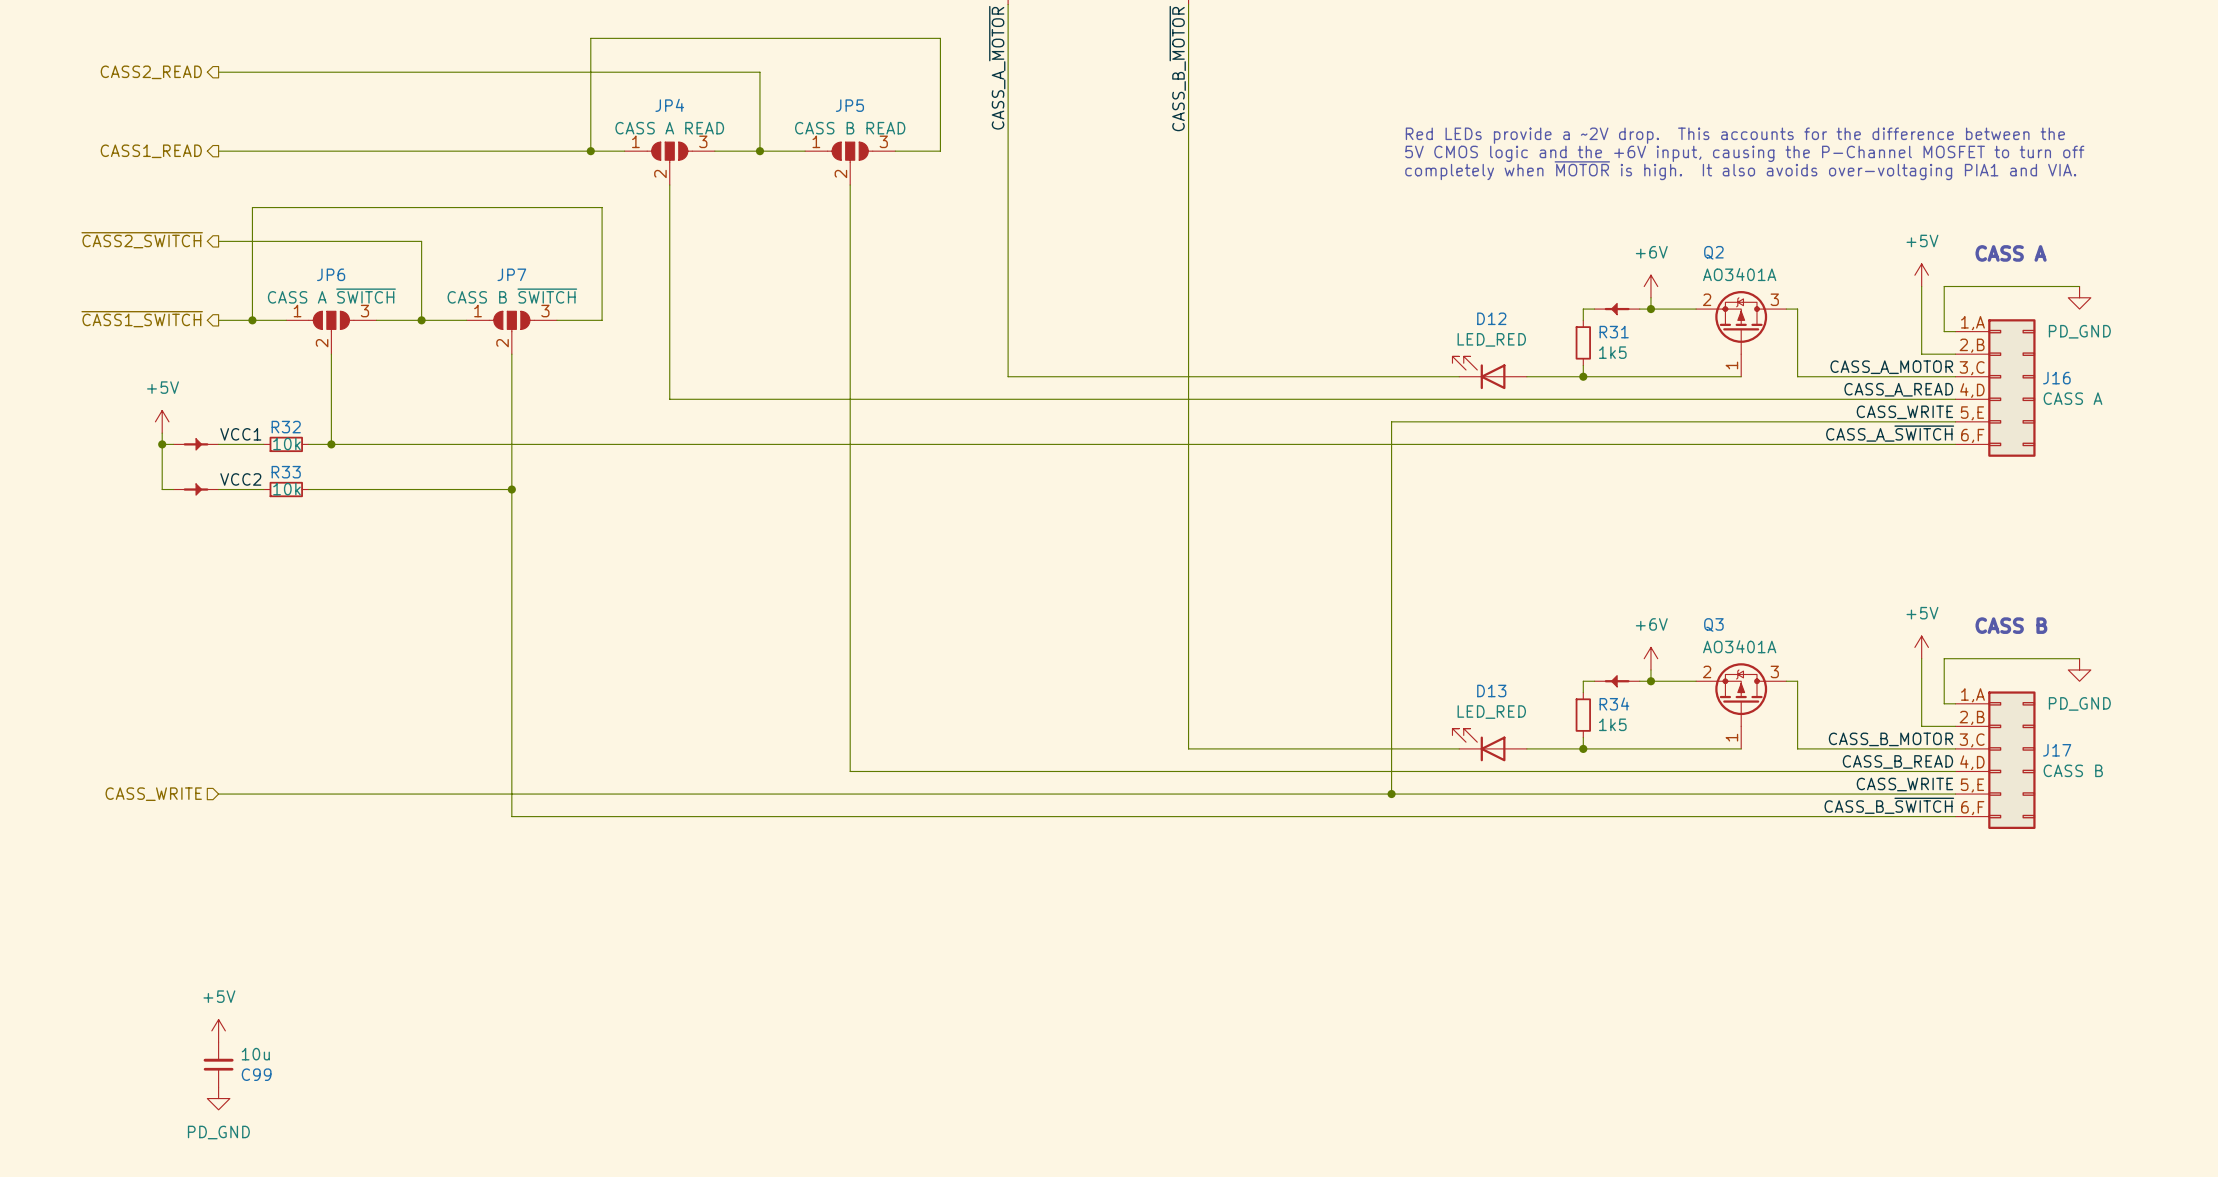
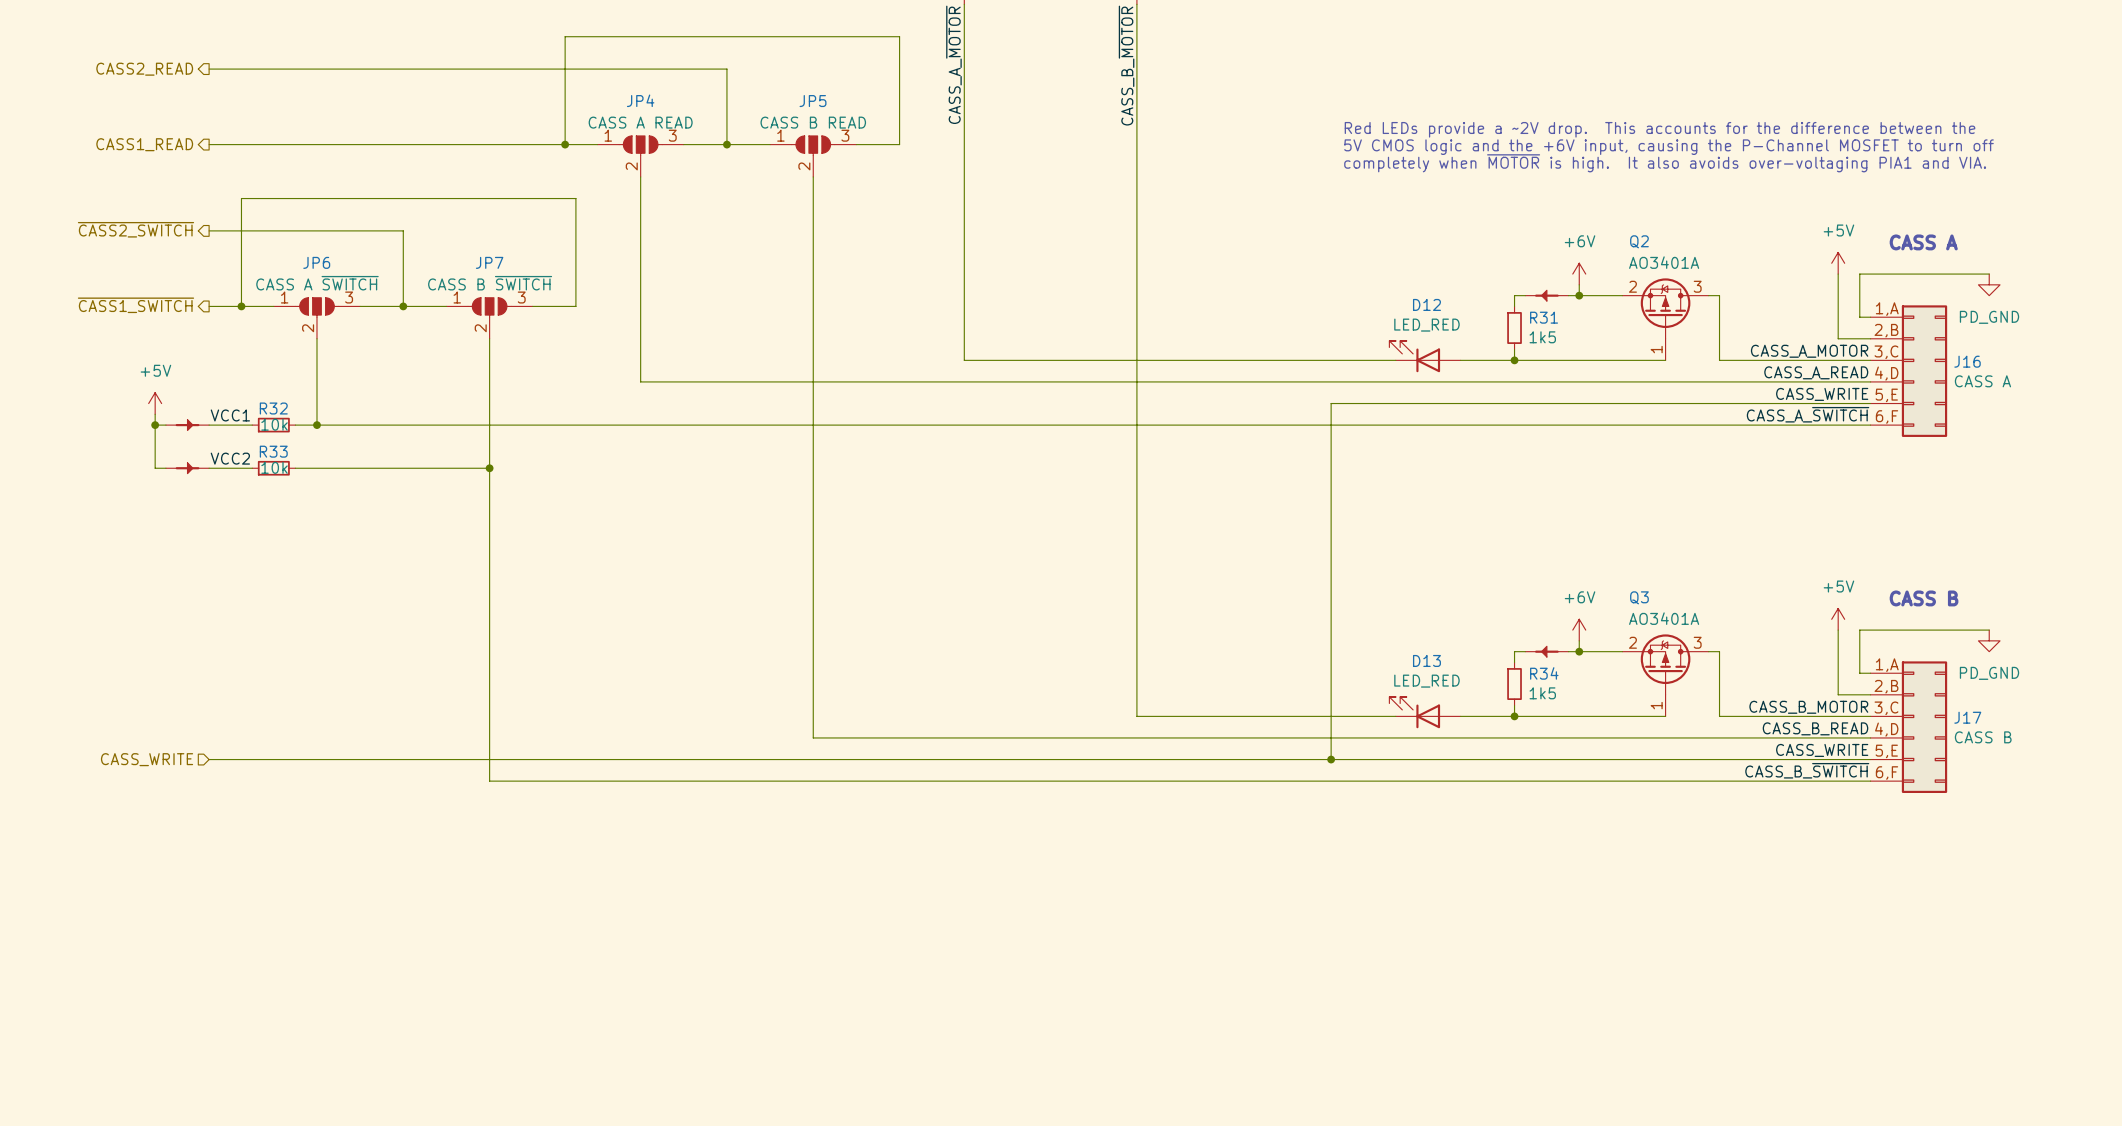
power symbol: +5V (218, 1030) -> none
C99: 10u (218, 1064) -> none
power symbol: PD_GND (218, 1098) -> none

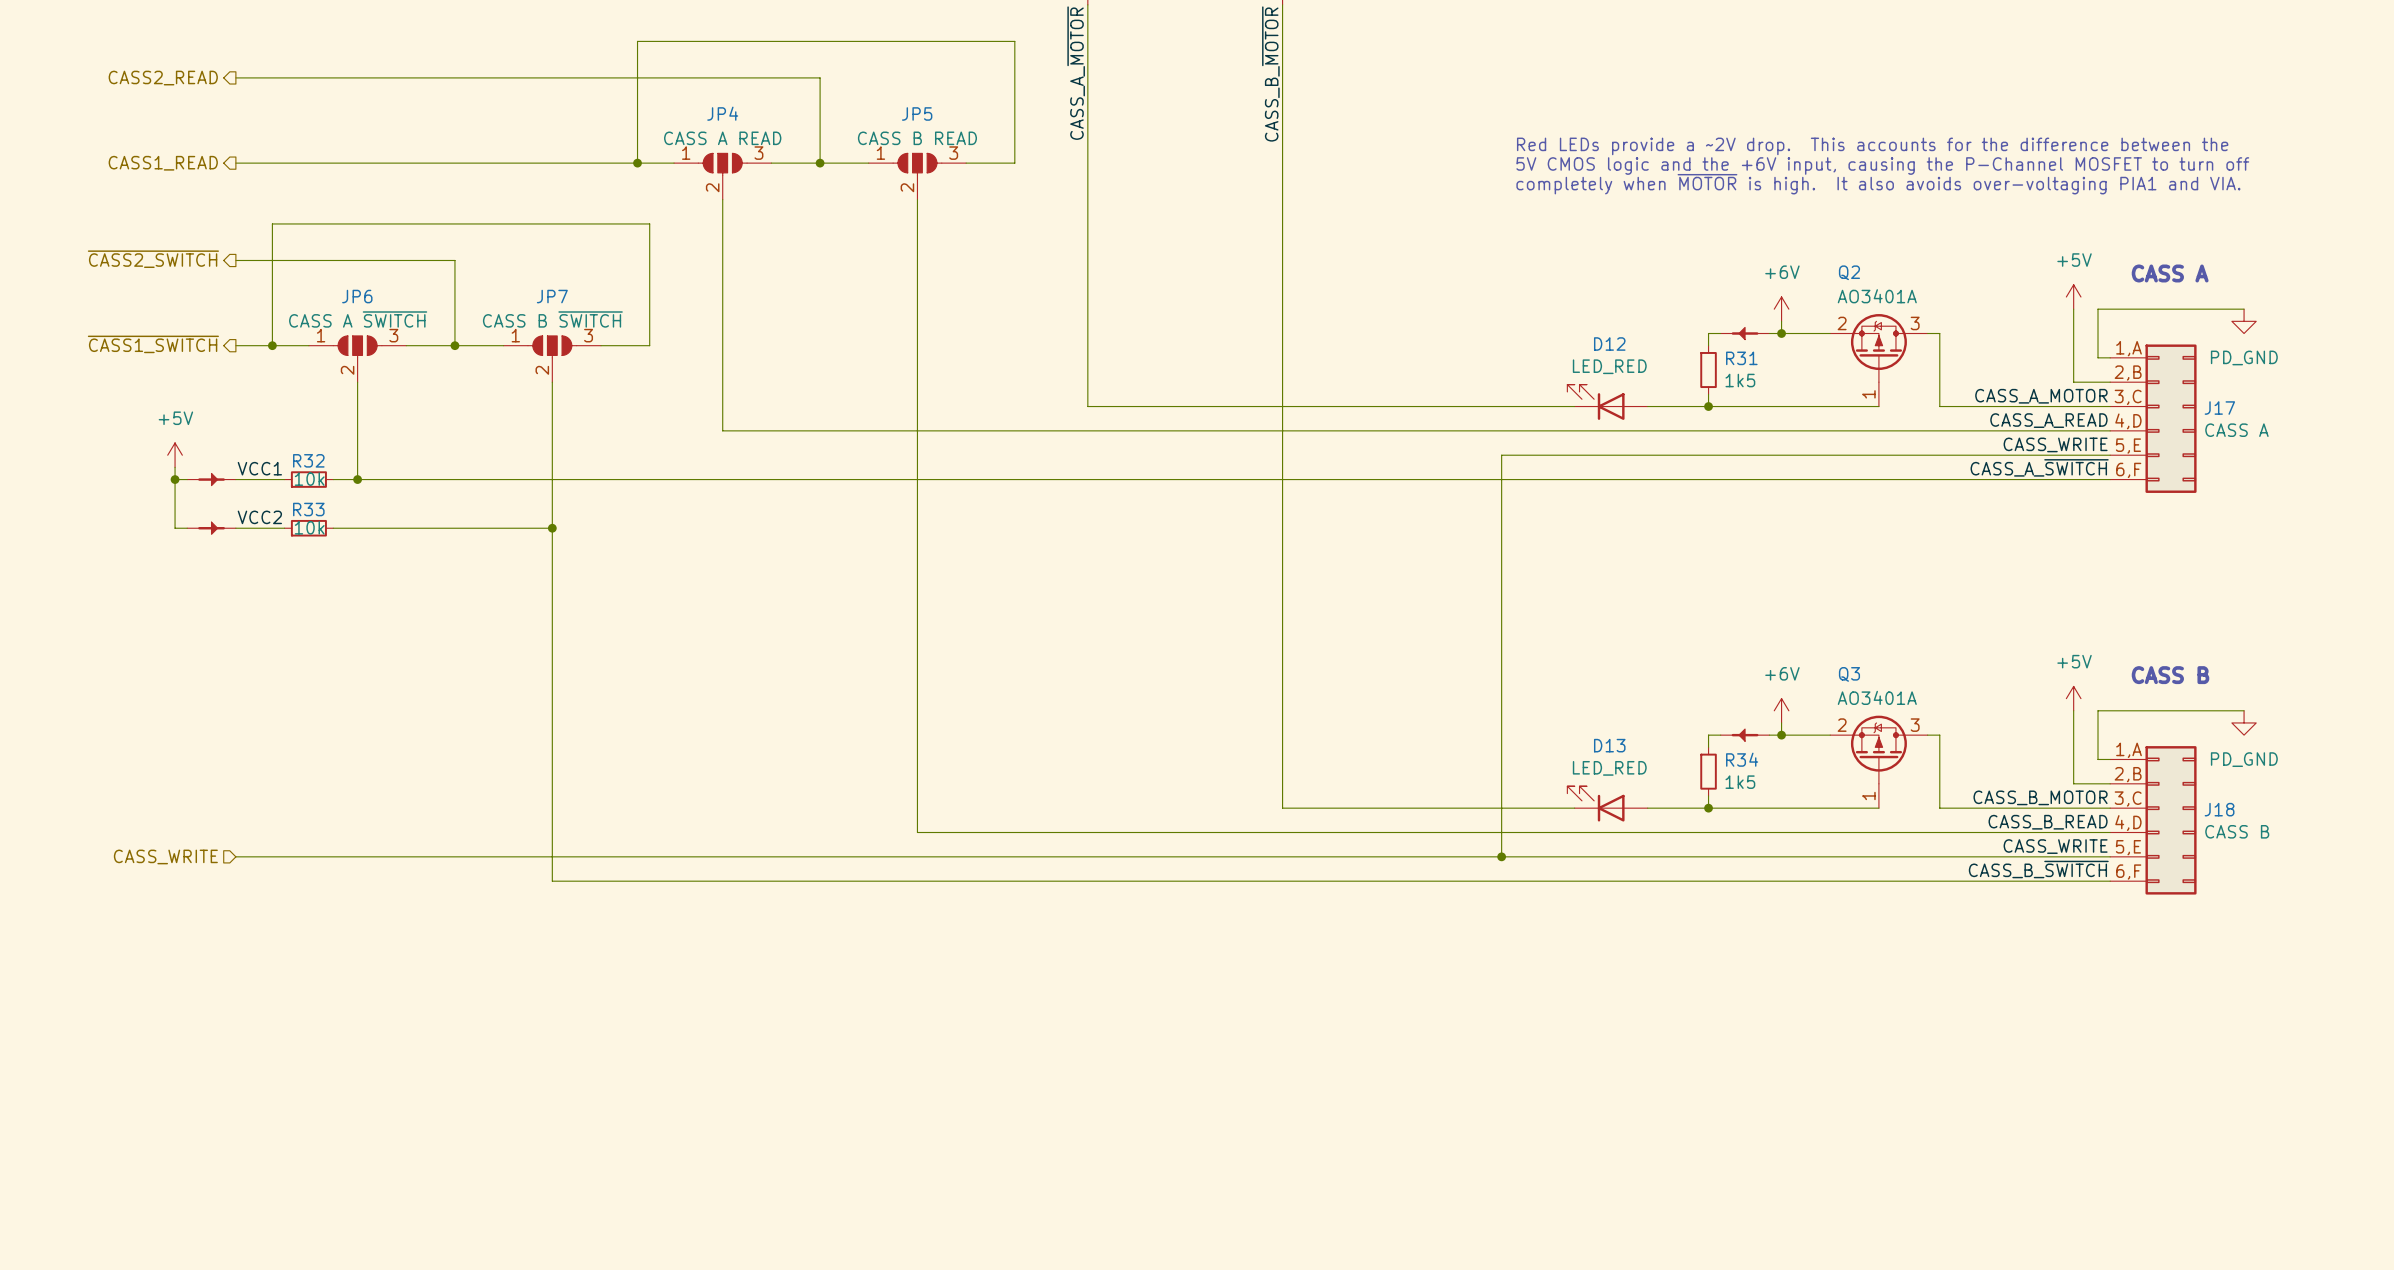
J16 name: J16 (1967, 361) -> J17 (2219, 408)
J17 name: J17 (1967, 717) -> J18 (2219, 809)

